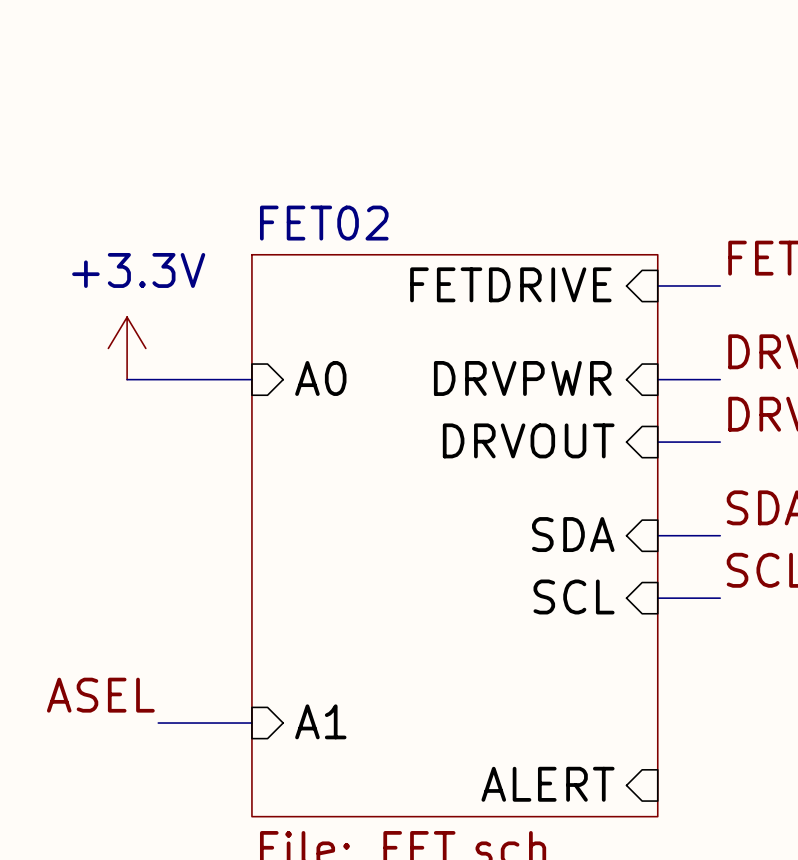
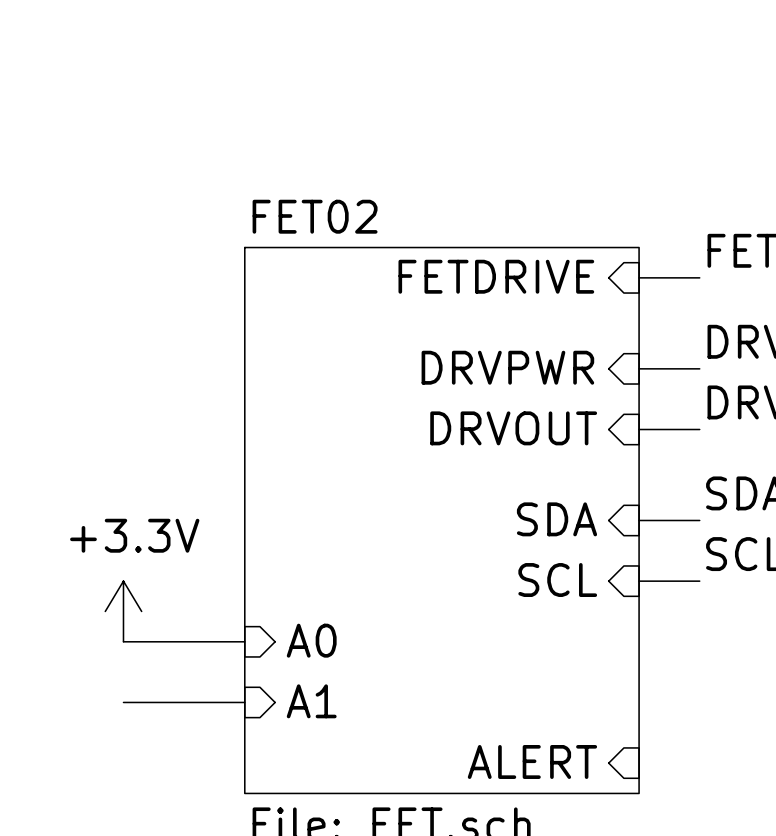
power symbol position: +3.3V (127, 348) -> +3.3V (123, 611)
sheet pin position: A0 (320, 378) -> A0 (311, 640)
wire: (127, 379) (251, 379) -> (123, 641) (244, 641)
label: ASEL (100, 695) -> none
wire: none -> (123, 702) (153, 702)

